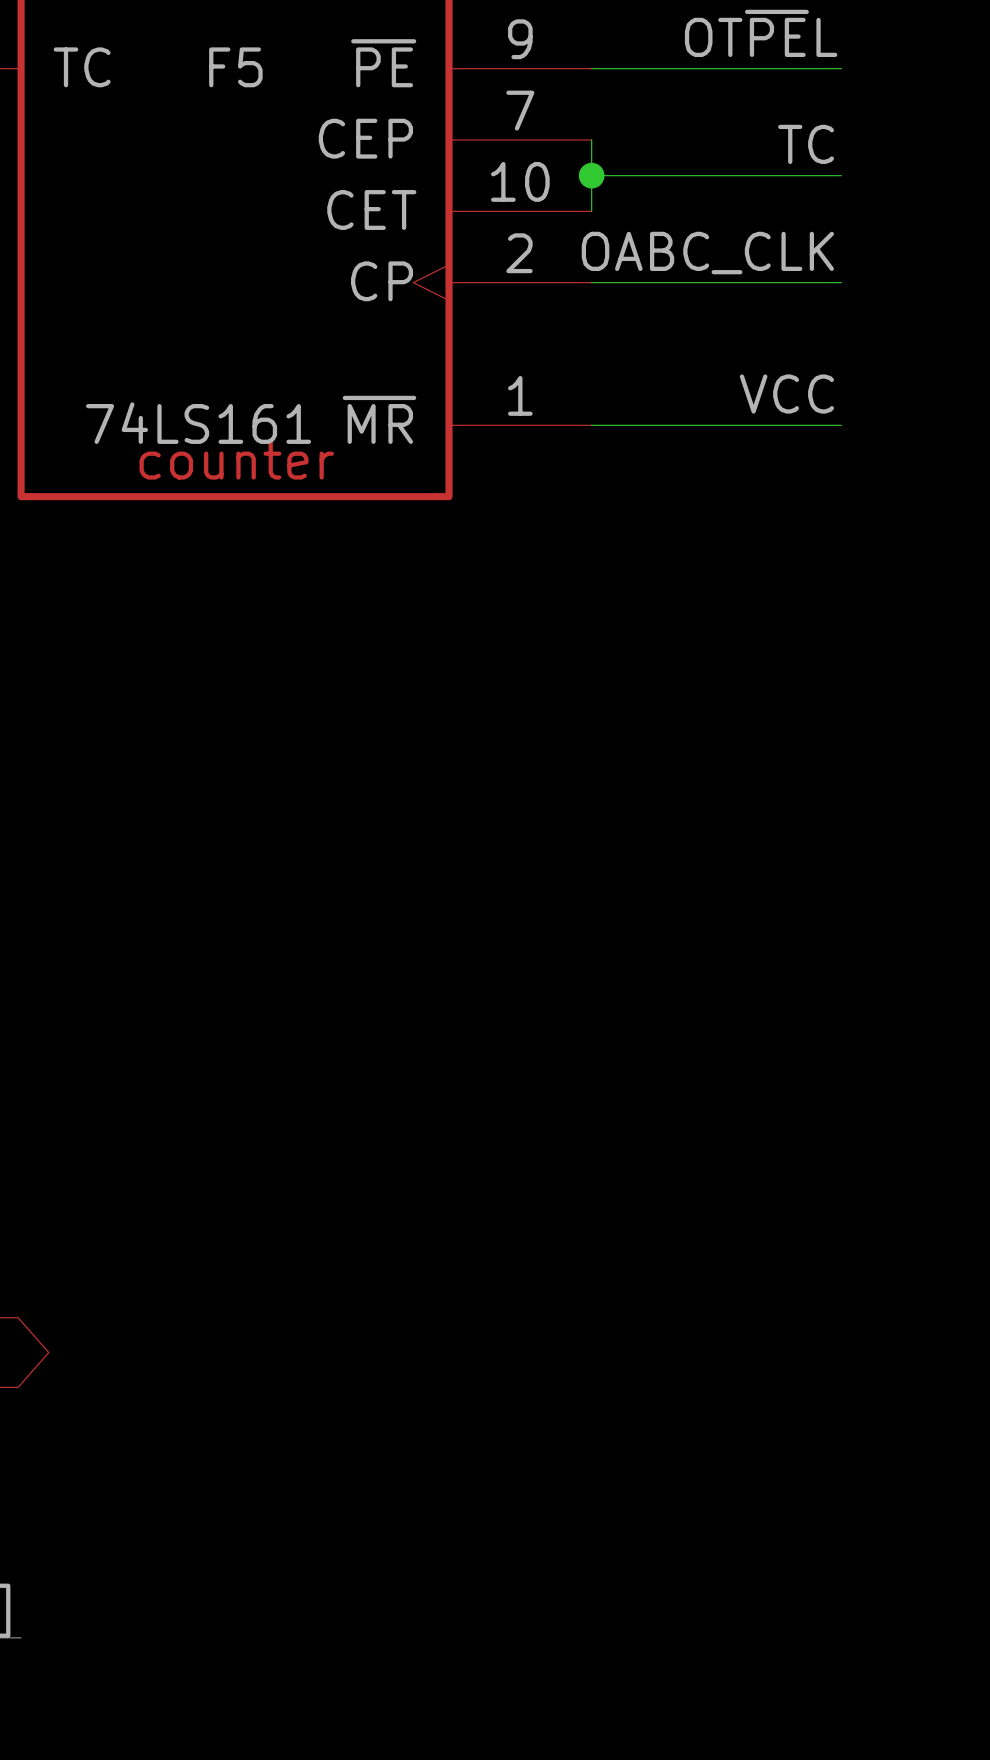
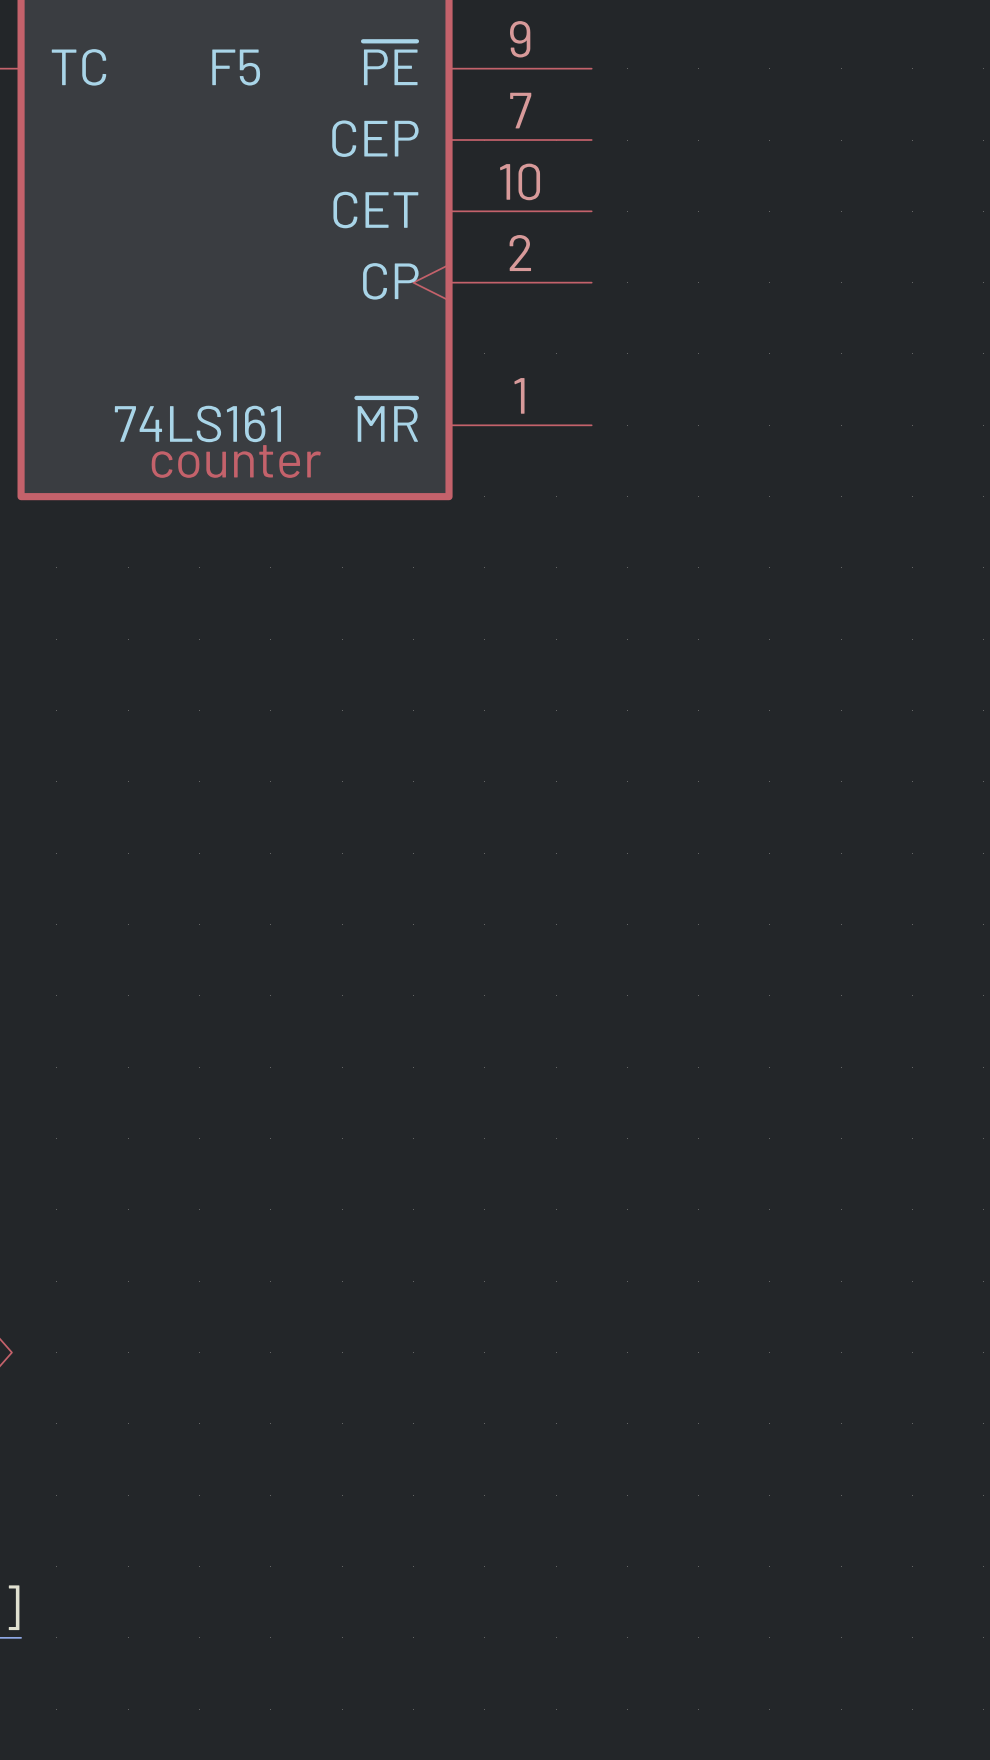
label: OT~{PE}L (761, 33) -> none
wire: (591, 68) (841, 68) -> none
wire: (591, 140) (591, 211) -> none
label: TC (806, 144) -> none
wire: (591, 175) (841, 175) -> none
junction: (591, 175) -> none
label: OABC_CLK (707, 253) -> none
wire: (591, 282) (841, 282) -> none
label: VCC (786, 394) -> none
wire: (591, 425) (841, 425) -> none

